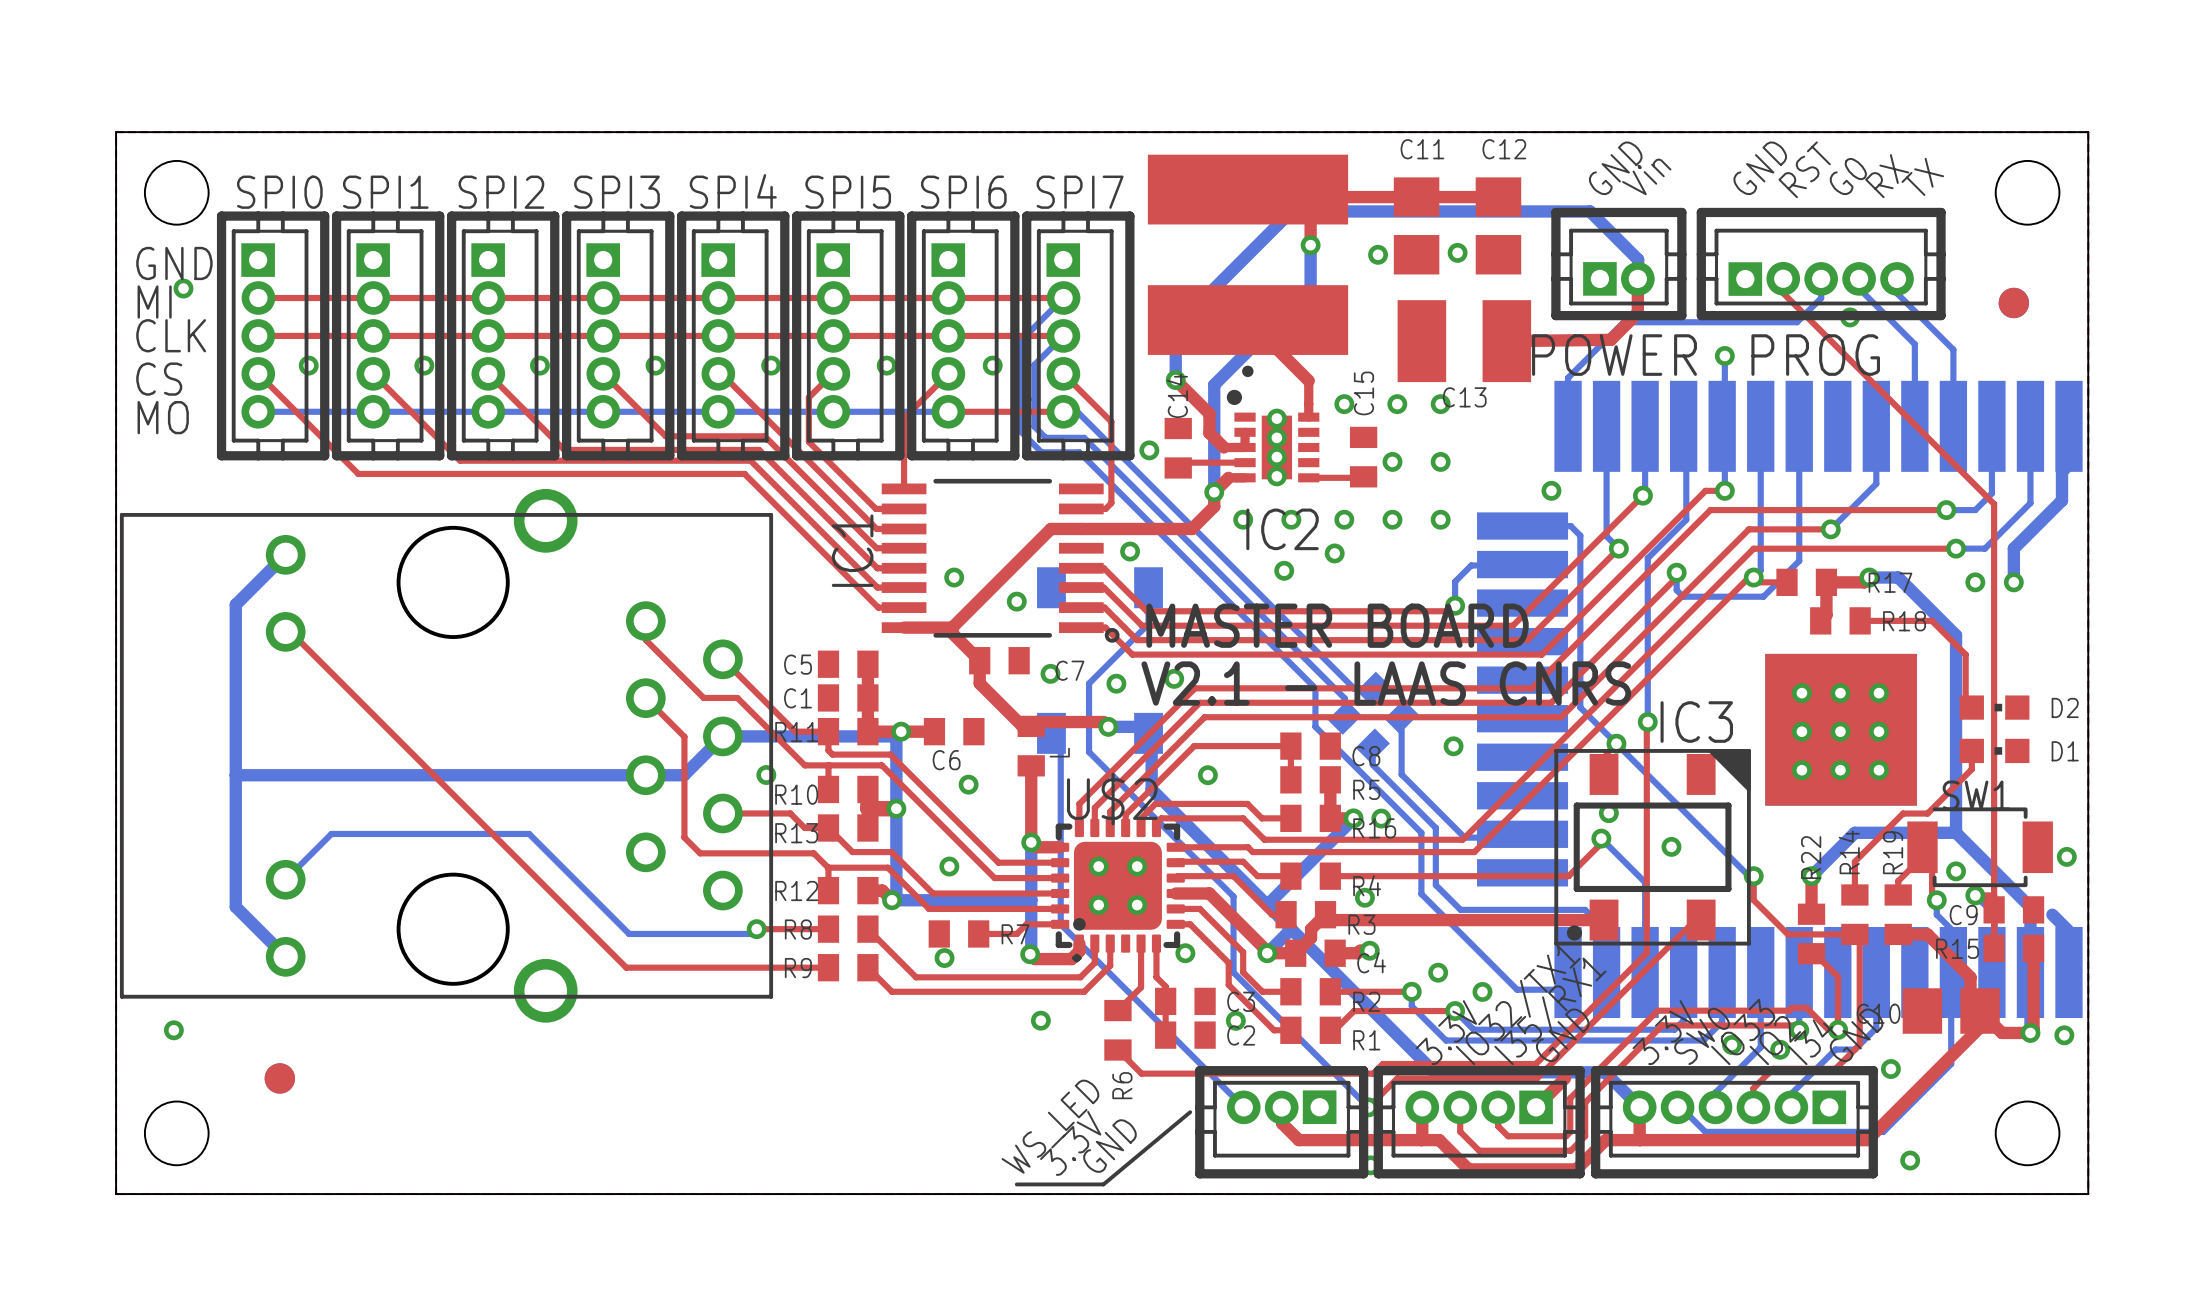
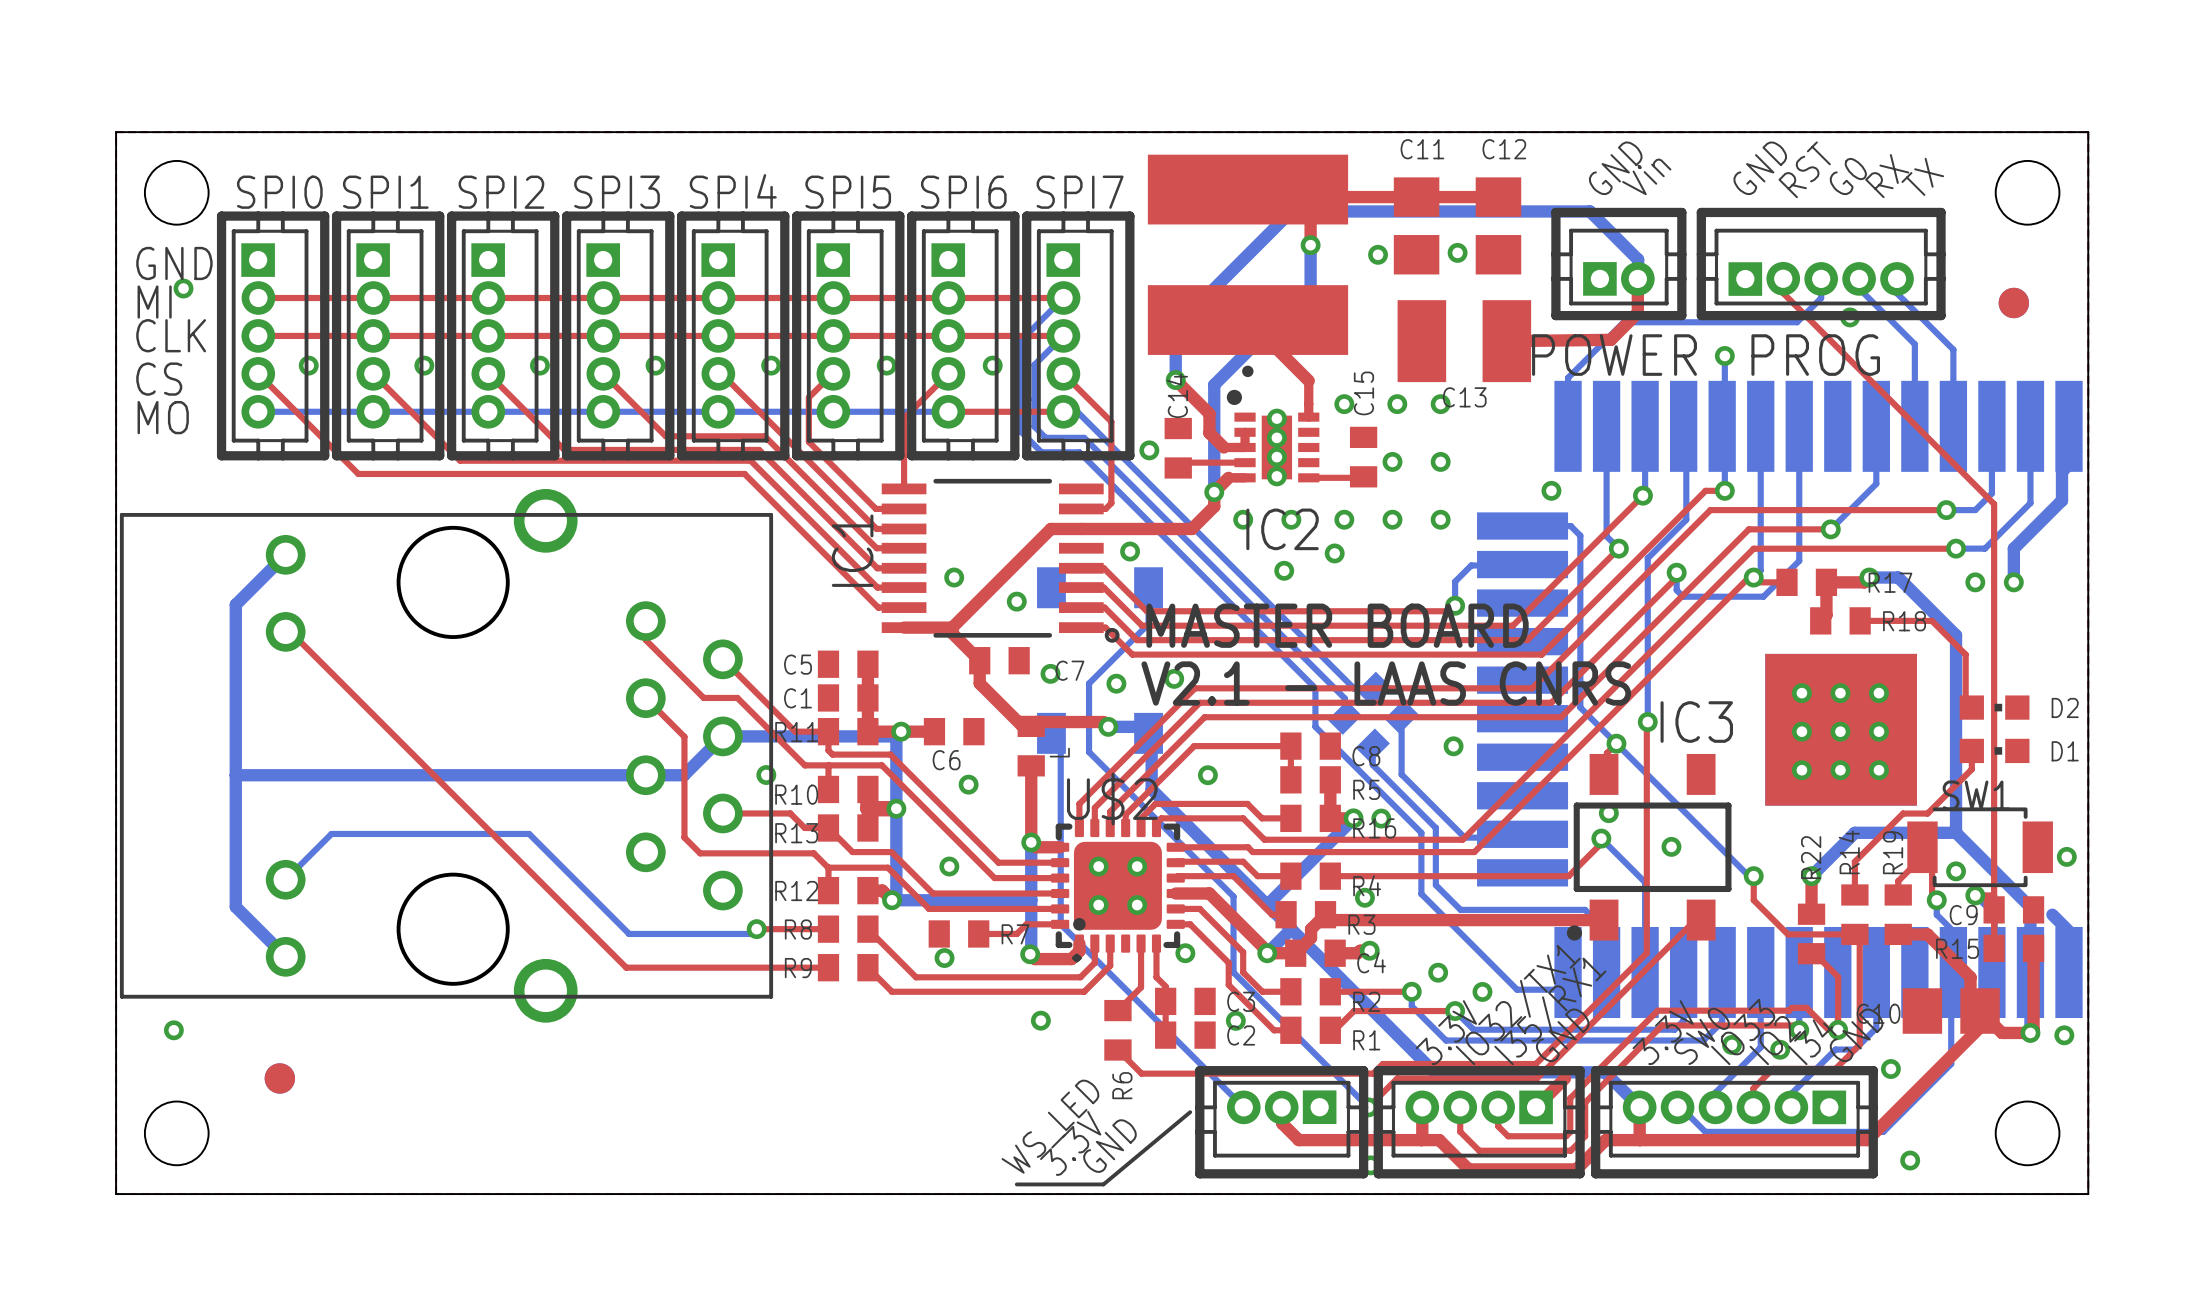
IC3 footprint: [1554, 749, 1751, 946] -> [1566, 753, 1732, 941]

